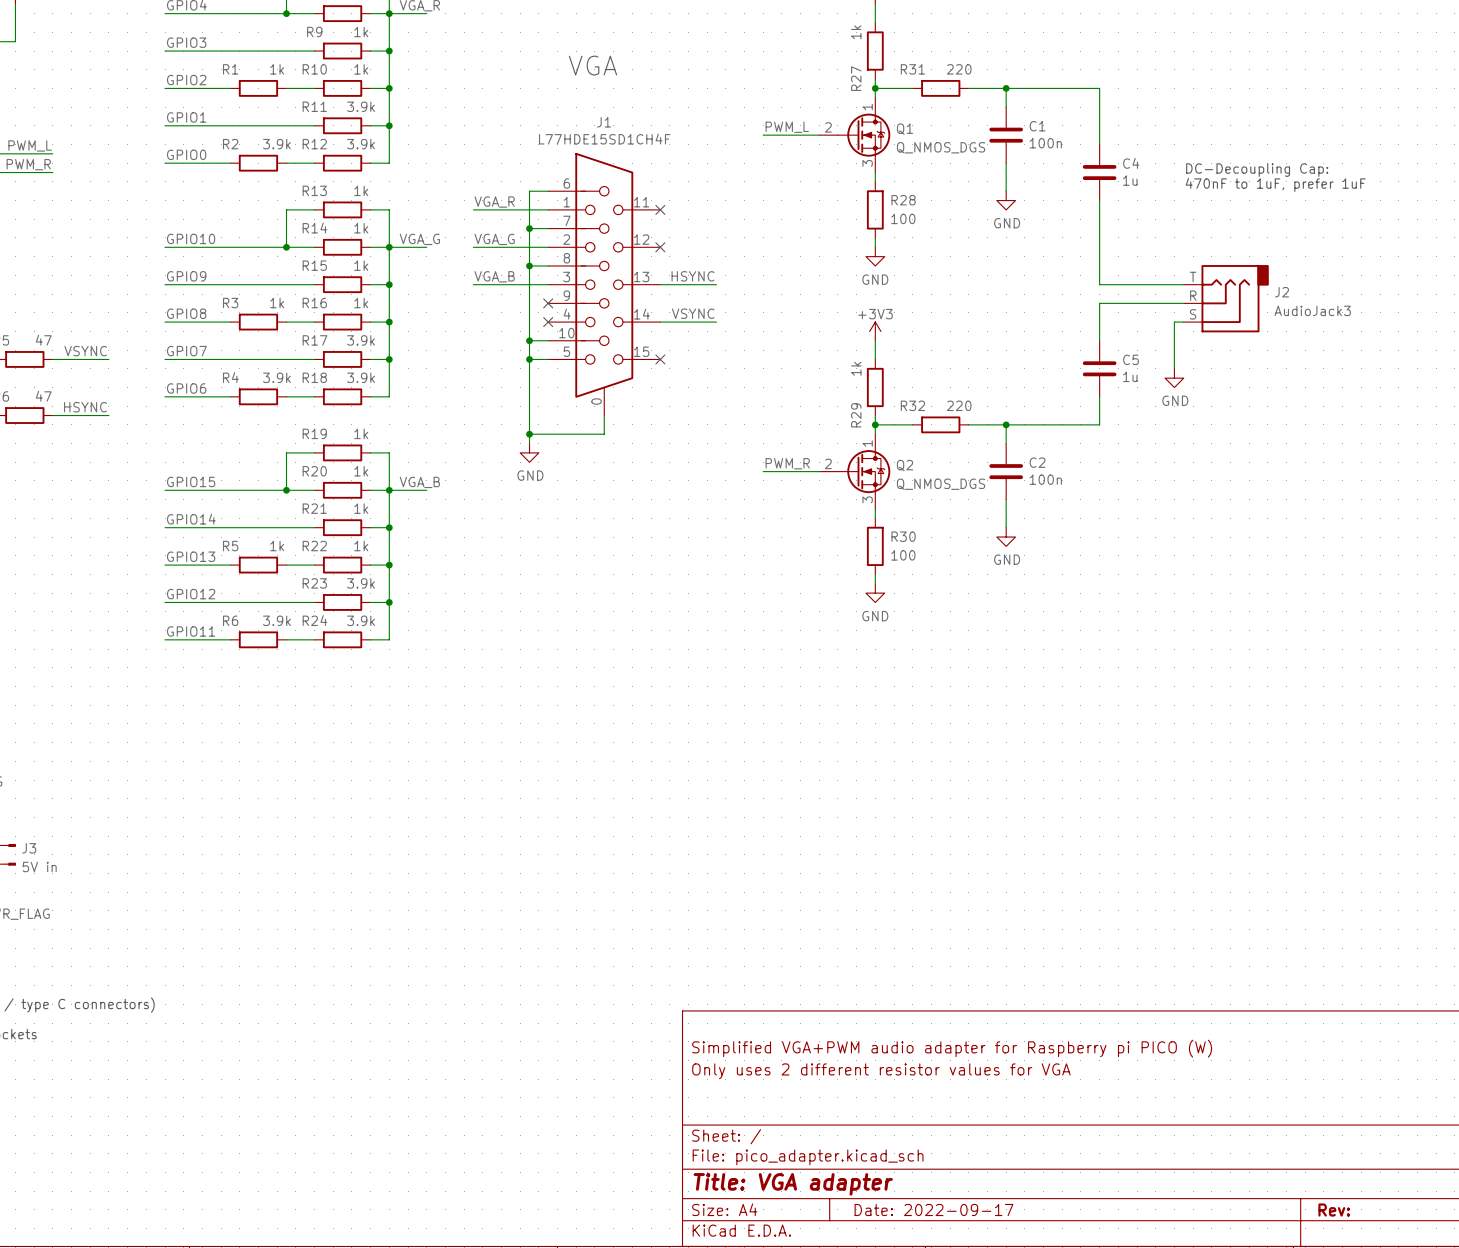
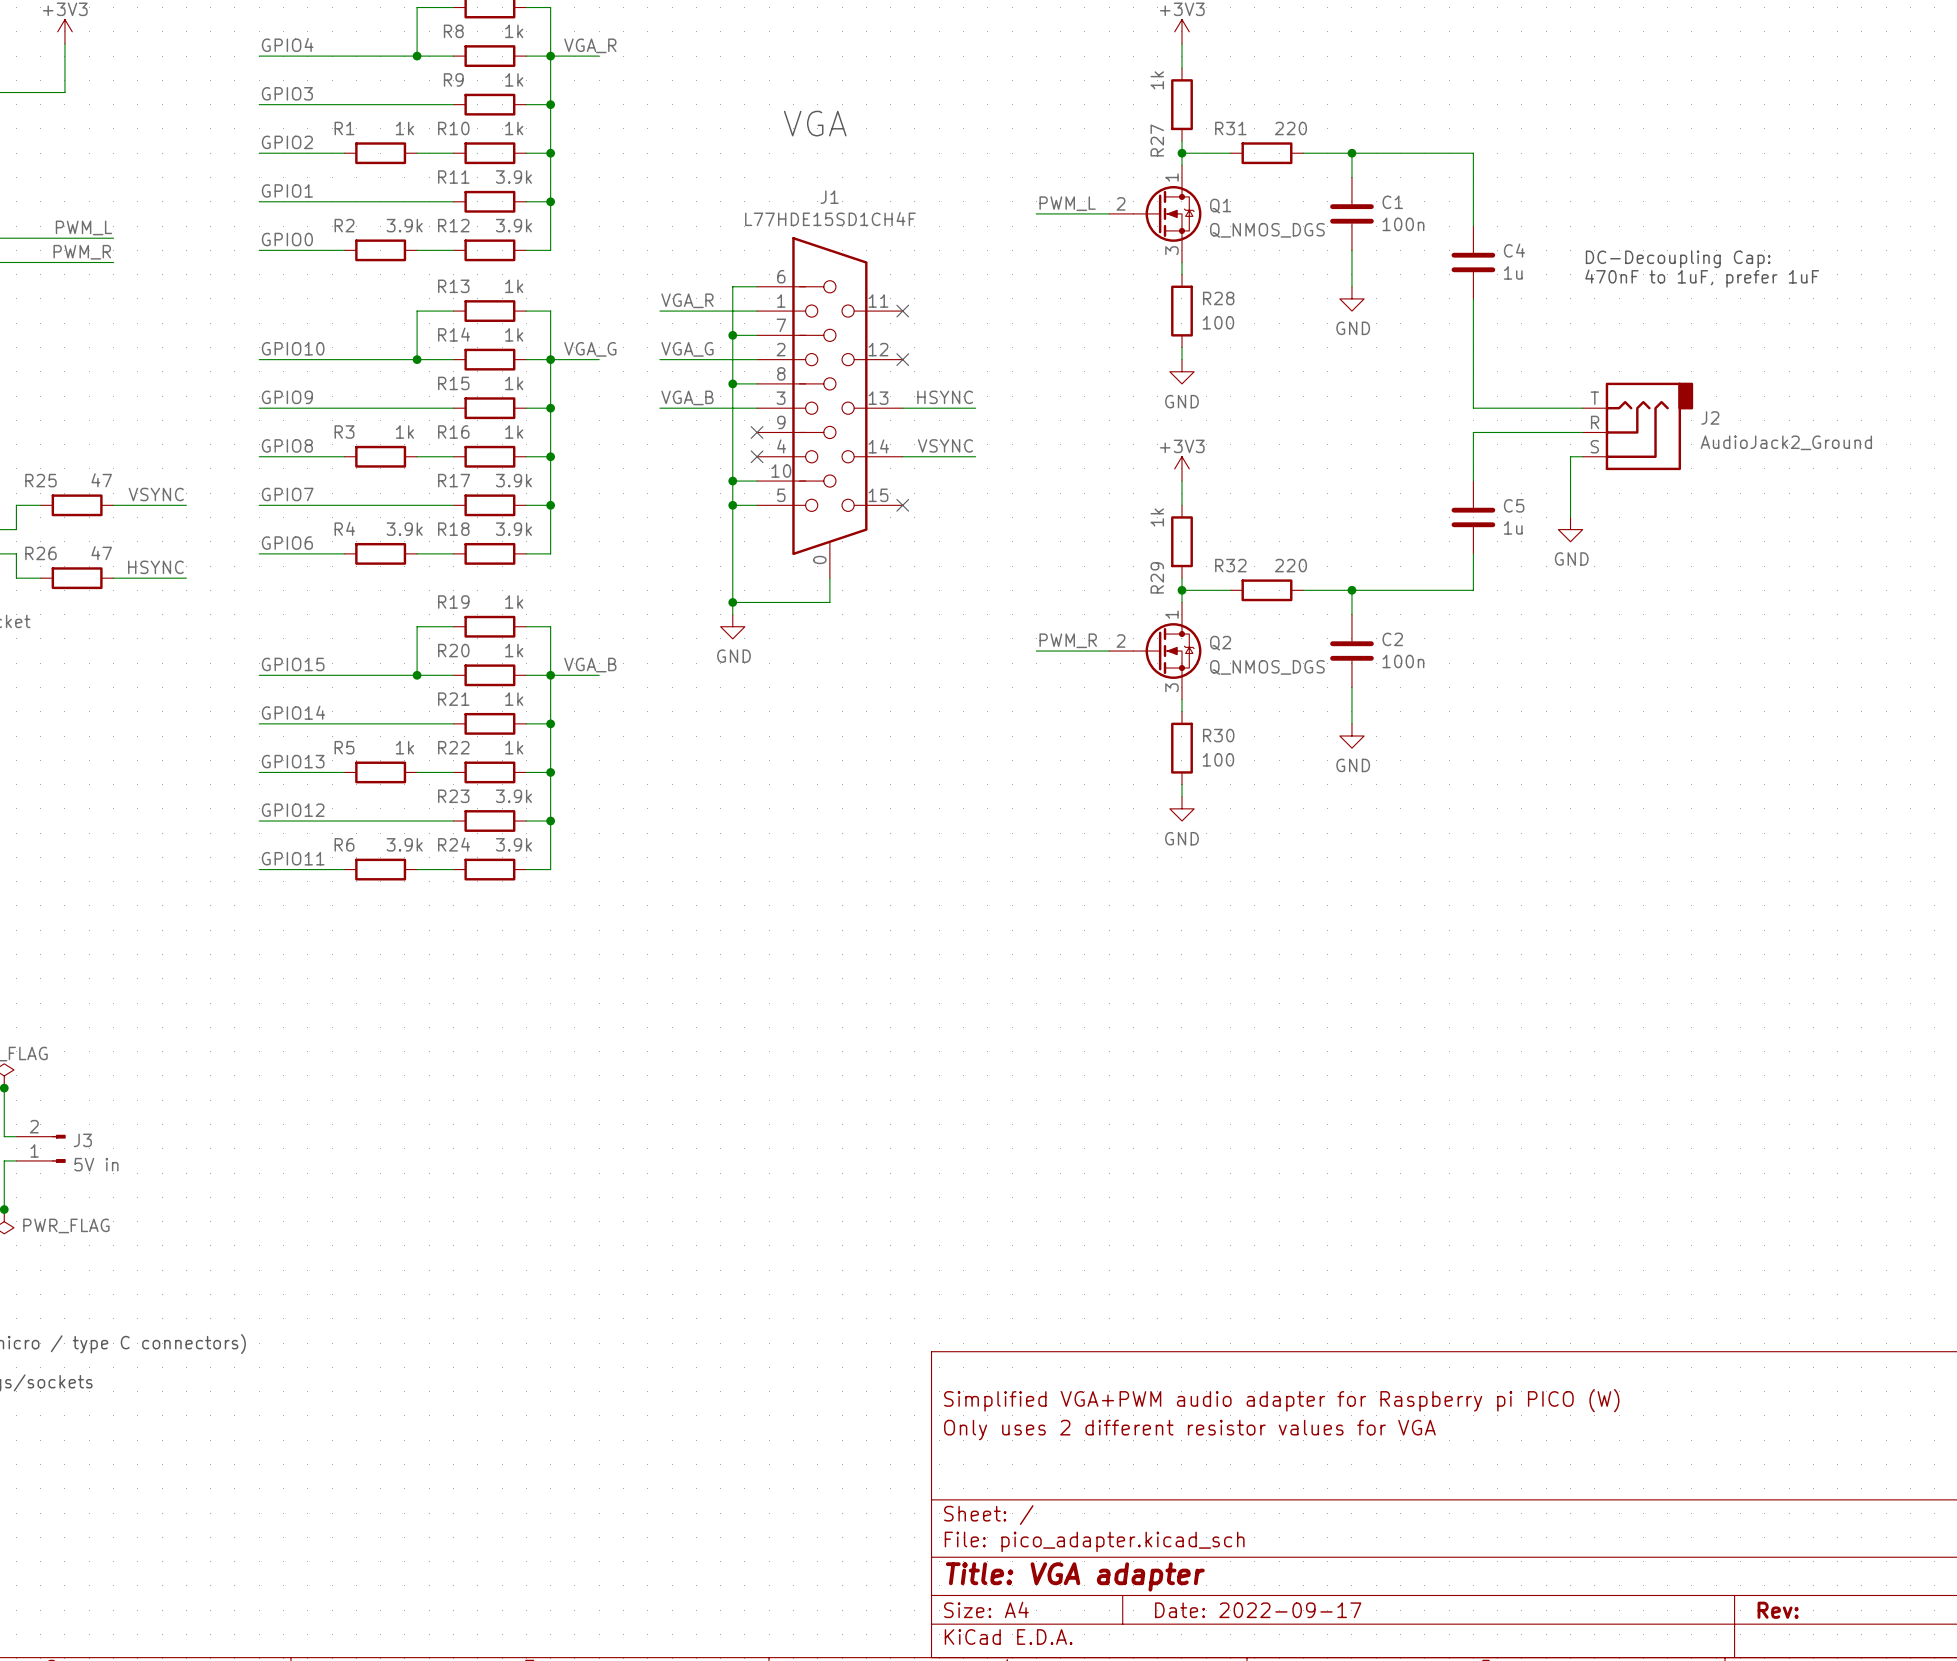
J2 value: AudioJack3 (1312, 310) -> AudioJack2_Ground (1786, 442)

